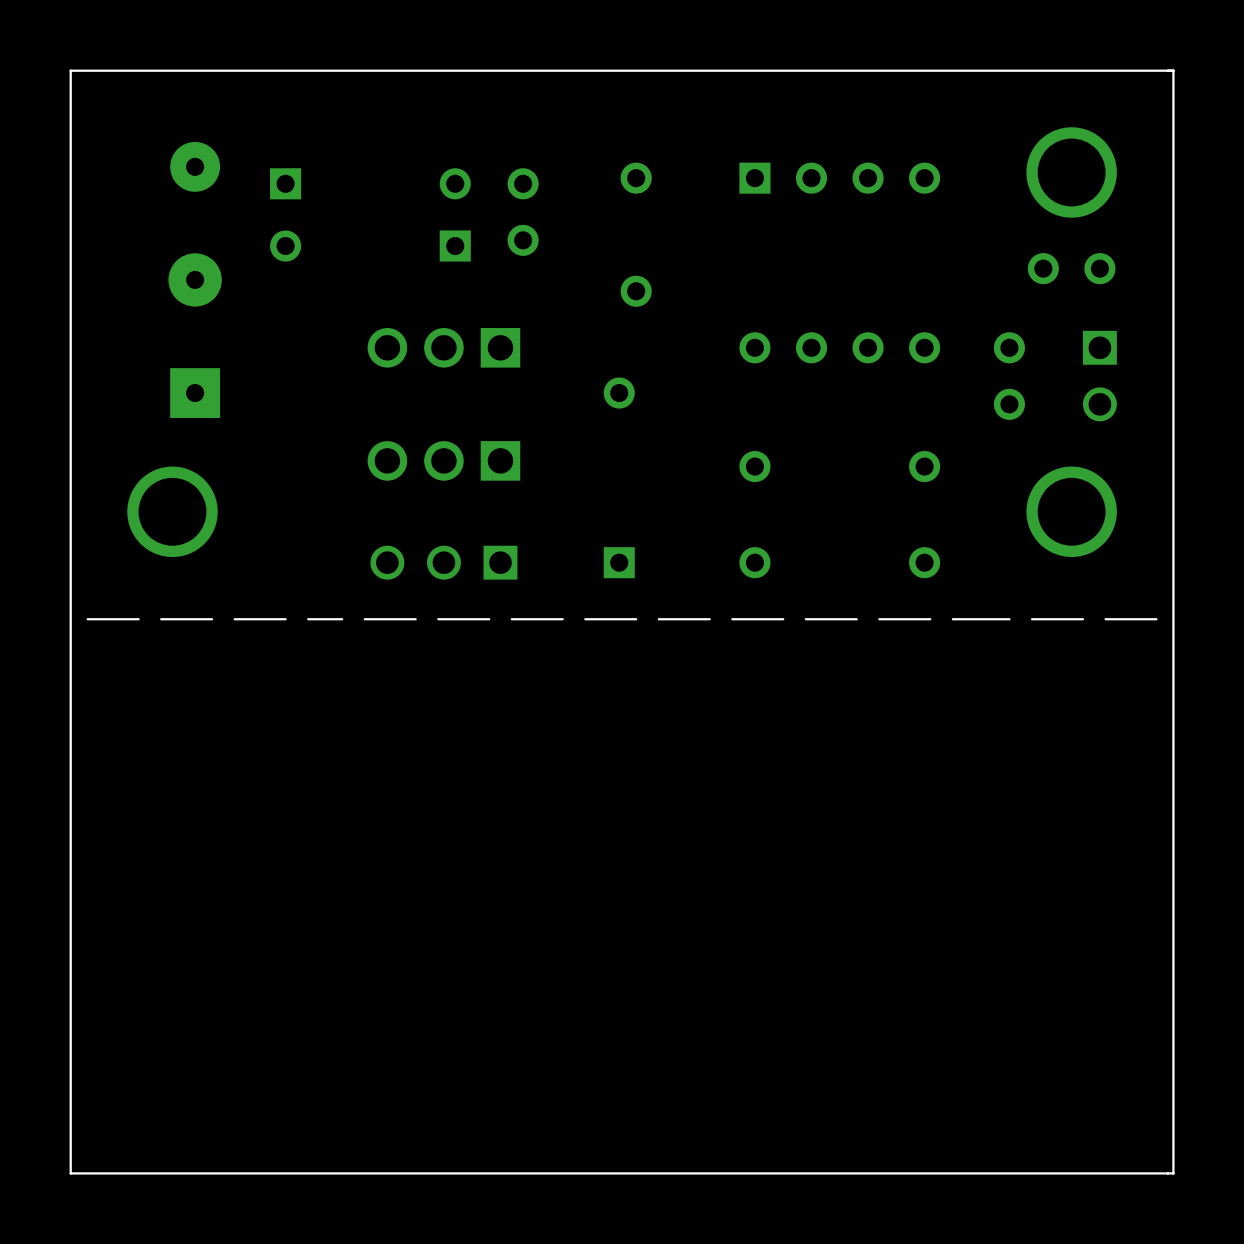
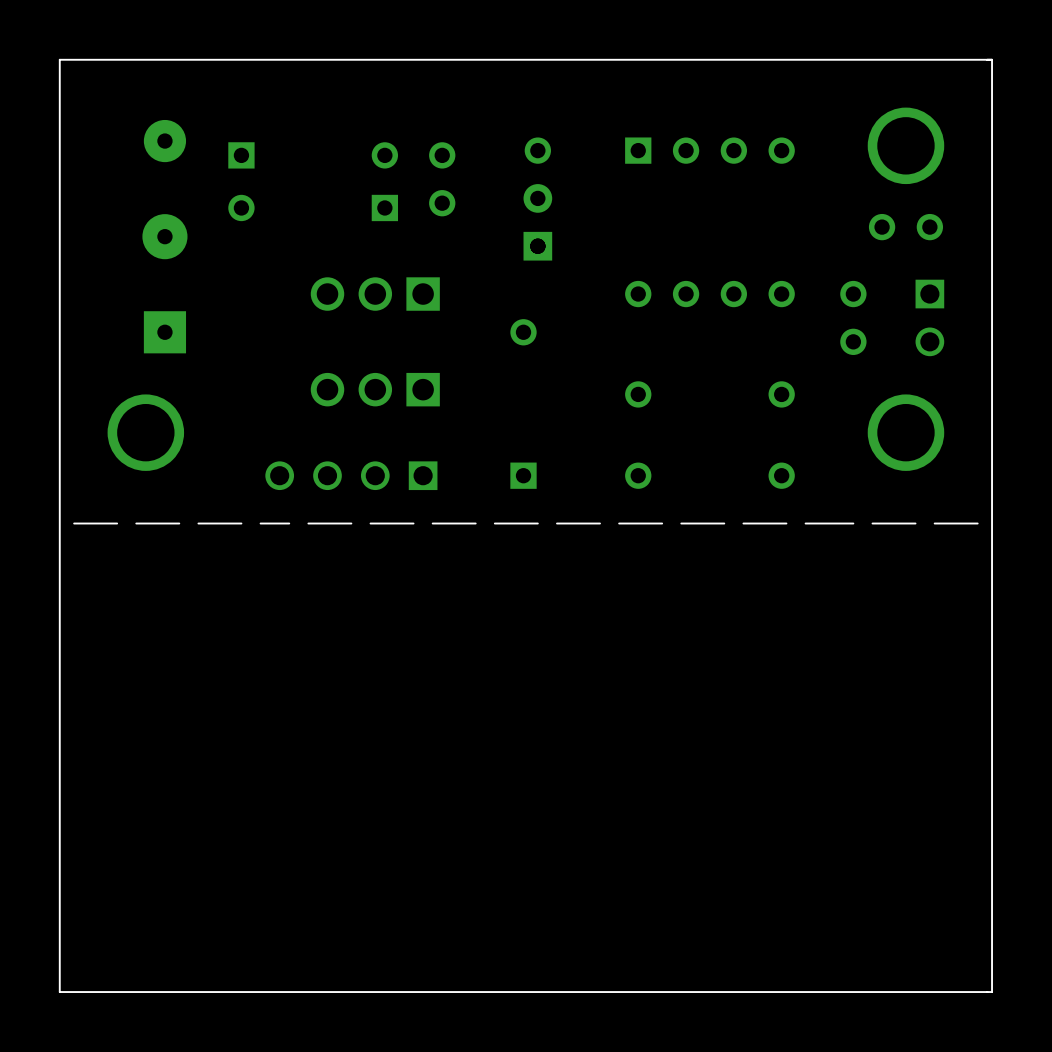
part: none -> (537, 222)
part: none -> (351, 475)

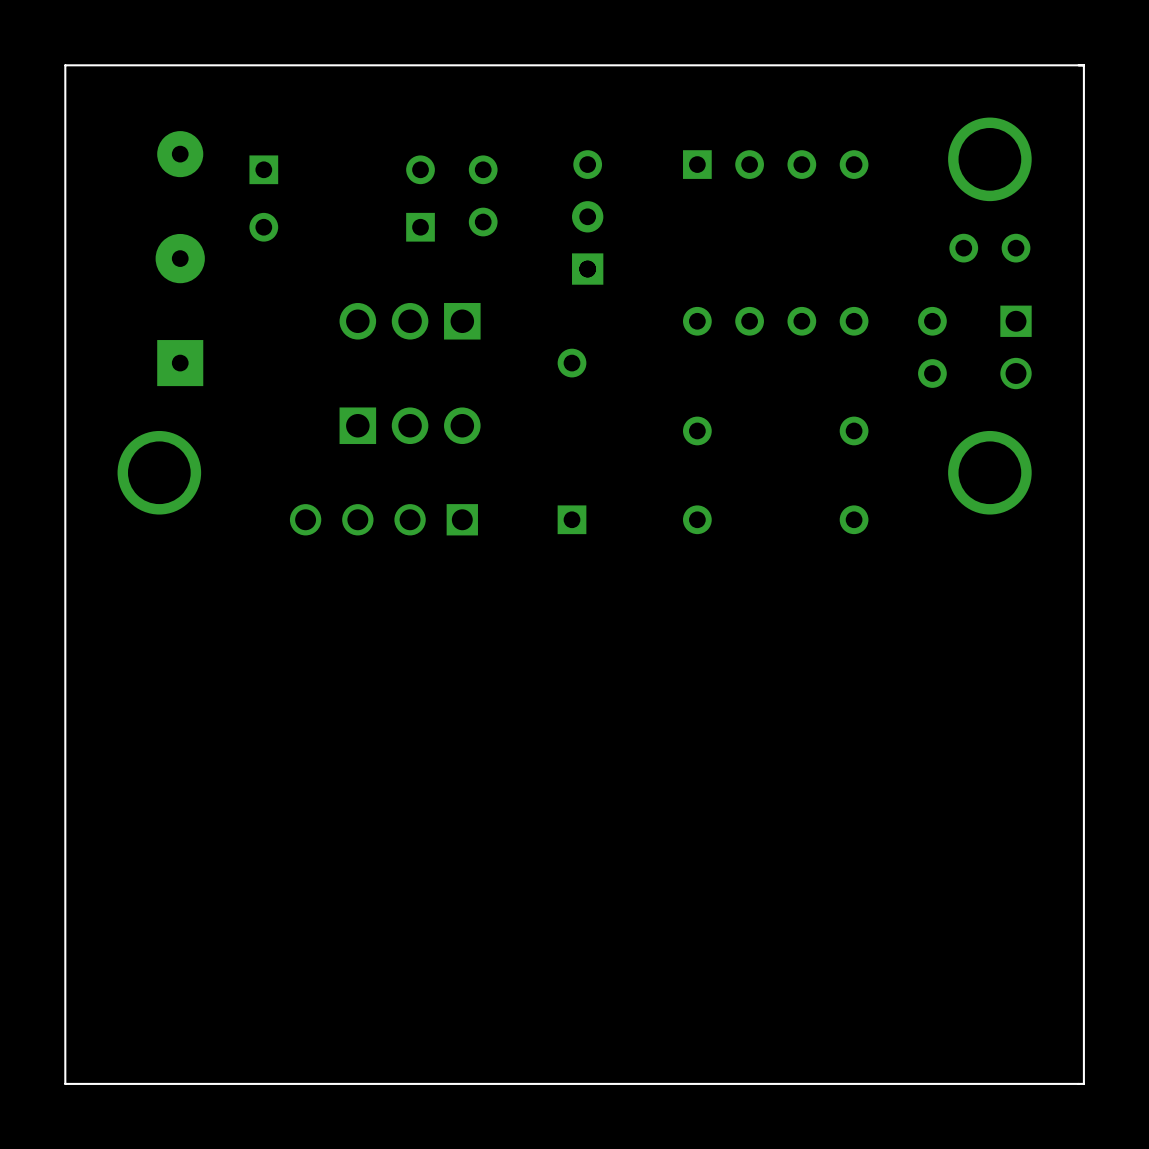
part rotation: 0° (375, 389) -> 180° (410, 425)
board edge: (117, 523) (74, 523) -> none
board edge: (179, 523) (136, 523) -> none
board edge: (241, 523) (198, 523) -> none
board edge: (289, 523) (260, 523) -> none
board edge: (351, 523) (308, 523) -> none
board edge: (413, 523) (370, 523) -> none
board edge: (475, 523) (432, 523) -> none
board edge: (537, 523) (494, 523) -> none
board edge: (600, 523) (556, 523) -> none
board edge: (662, 523) (619, 523) -> none
board edge: (724, 523) (681, 523) -> none
board edge: (786, 523) (743, 523) -> none
board edge: (853, 523) (805, 523) -> none
board edge: (915, 523) (872, 523) -> none
board edge: (977, 523) (934, 523) -> none

